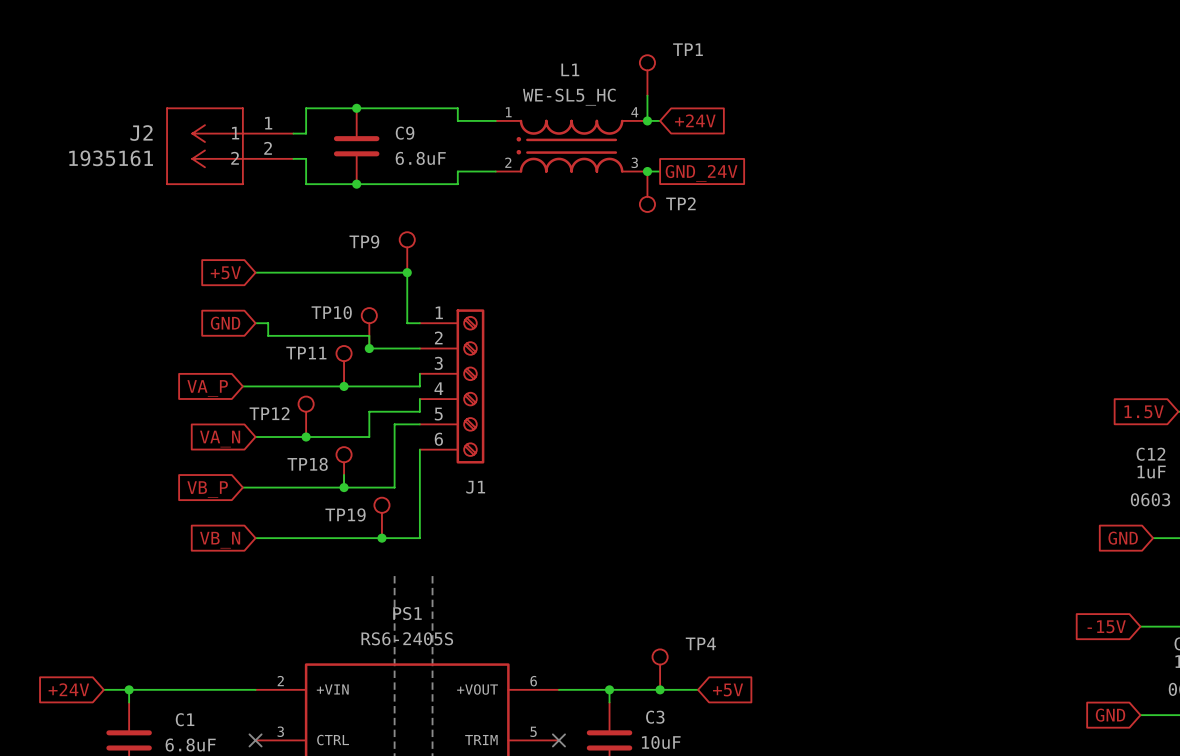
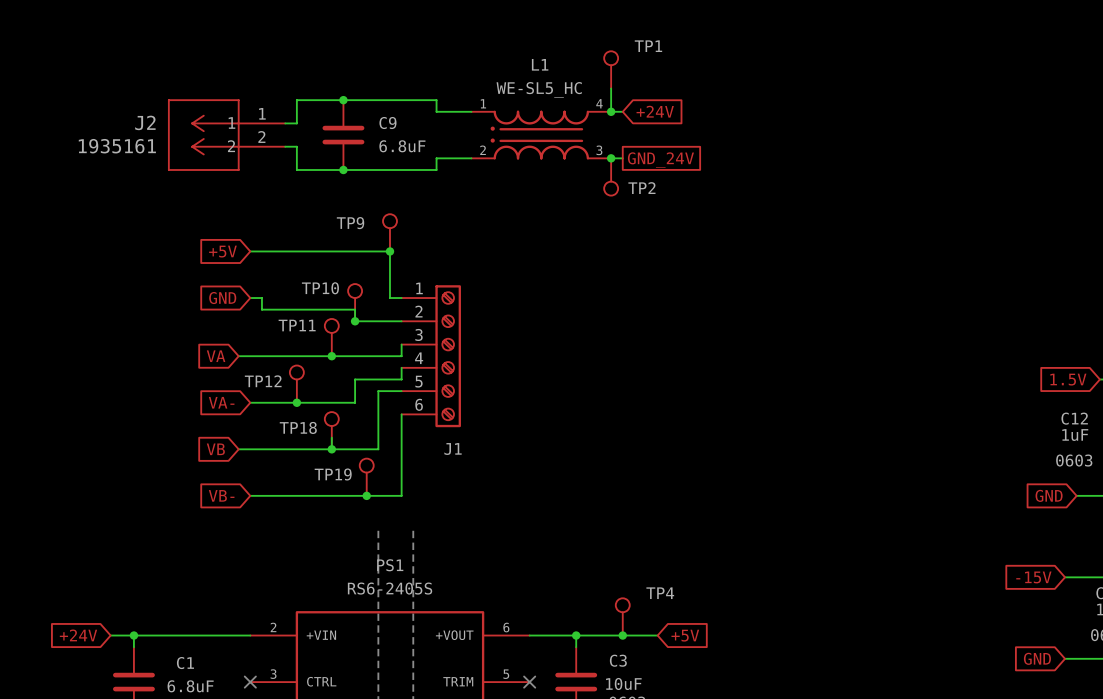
global label: VA_P (207, 388) -> VA (216, 356)
global label: VA_N (220, 439) -> VA- (221, 402)
global label: VB_P (207, 489) -> VB (215, 449)
global label: VB_N (220, 540) -> VB- (221, 495)

